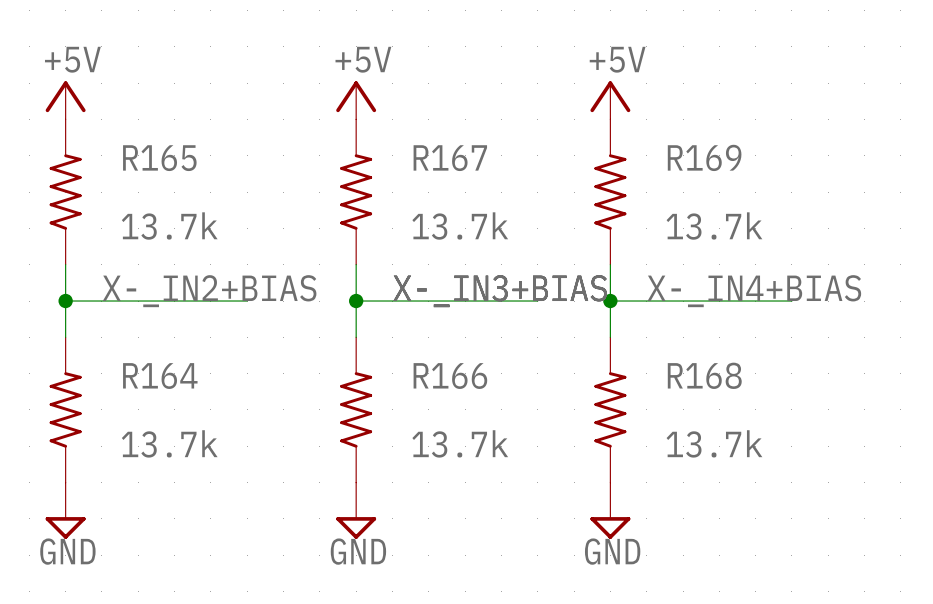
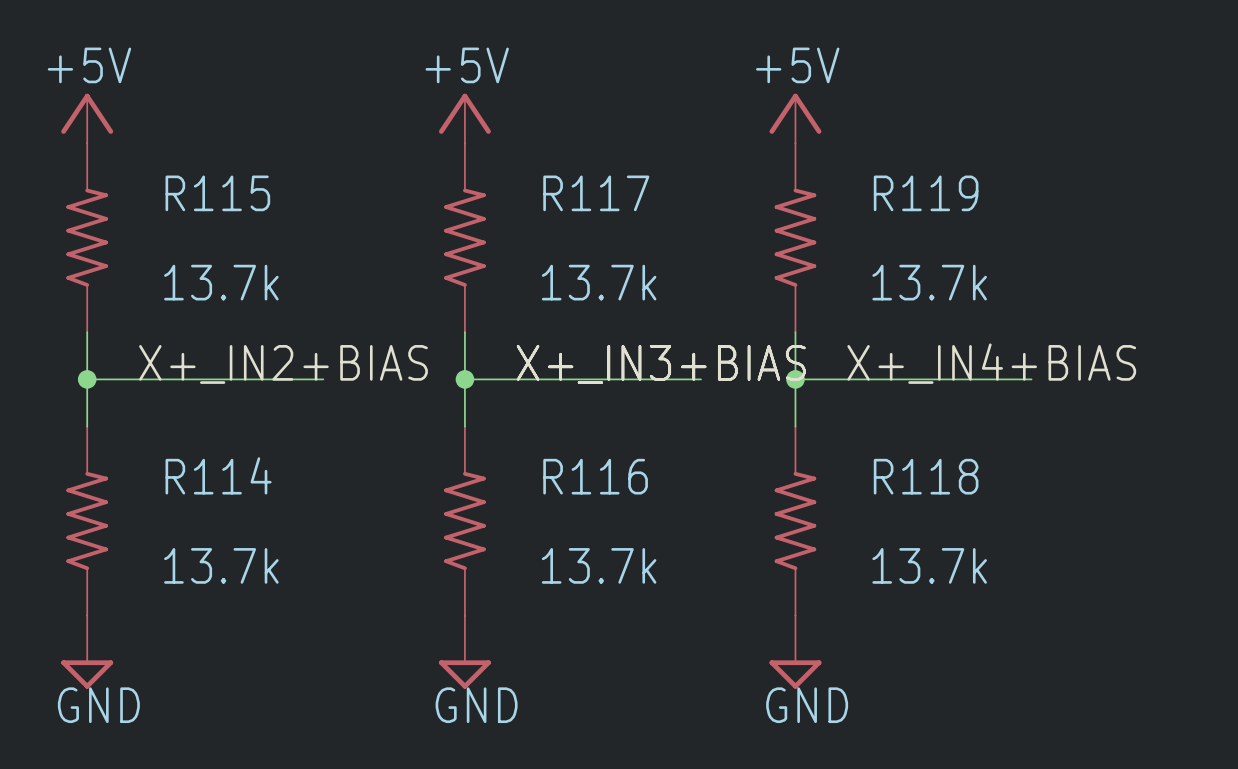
R169 name: R169 (704, 157) -> R119 (926, 193)
R165 name: R165 (159, 158) -> R115 (217, 193)
R167 name: R167 (450, 158) -> R117 (596, 193)
label: X-_IN2+BIAS (209, 291) -> X+_IN2+BIAS (283, 364)
label: X-_IN3+BIAS (500, 291) -> X+_IN3+BIAS (661, 364)
label: X-_IN4+BIAS (754, 291) -> X+_IN4+BIAS (991, 363)
R168 name: R168 (704, 375) -> R118 (926, 476)
R164 name: R164 (160, 376) -> R114 (218, 475)
R166 name: R166 (450, 376) -> R116 (595, 476)

